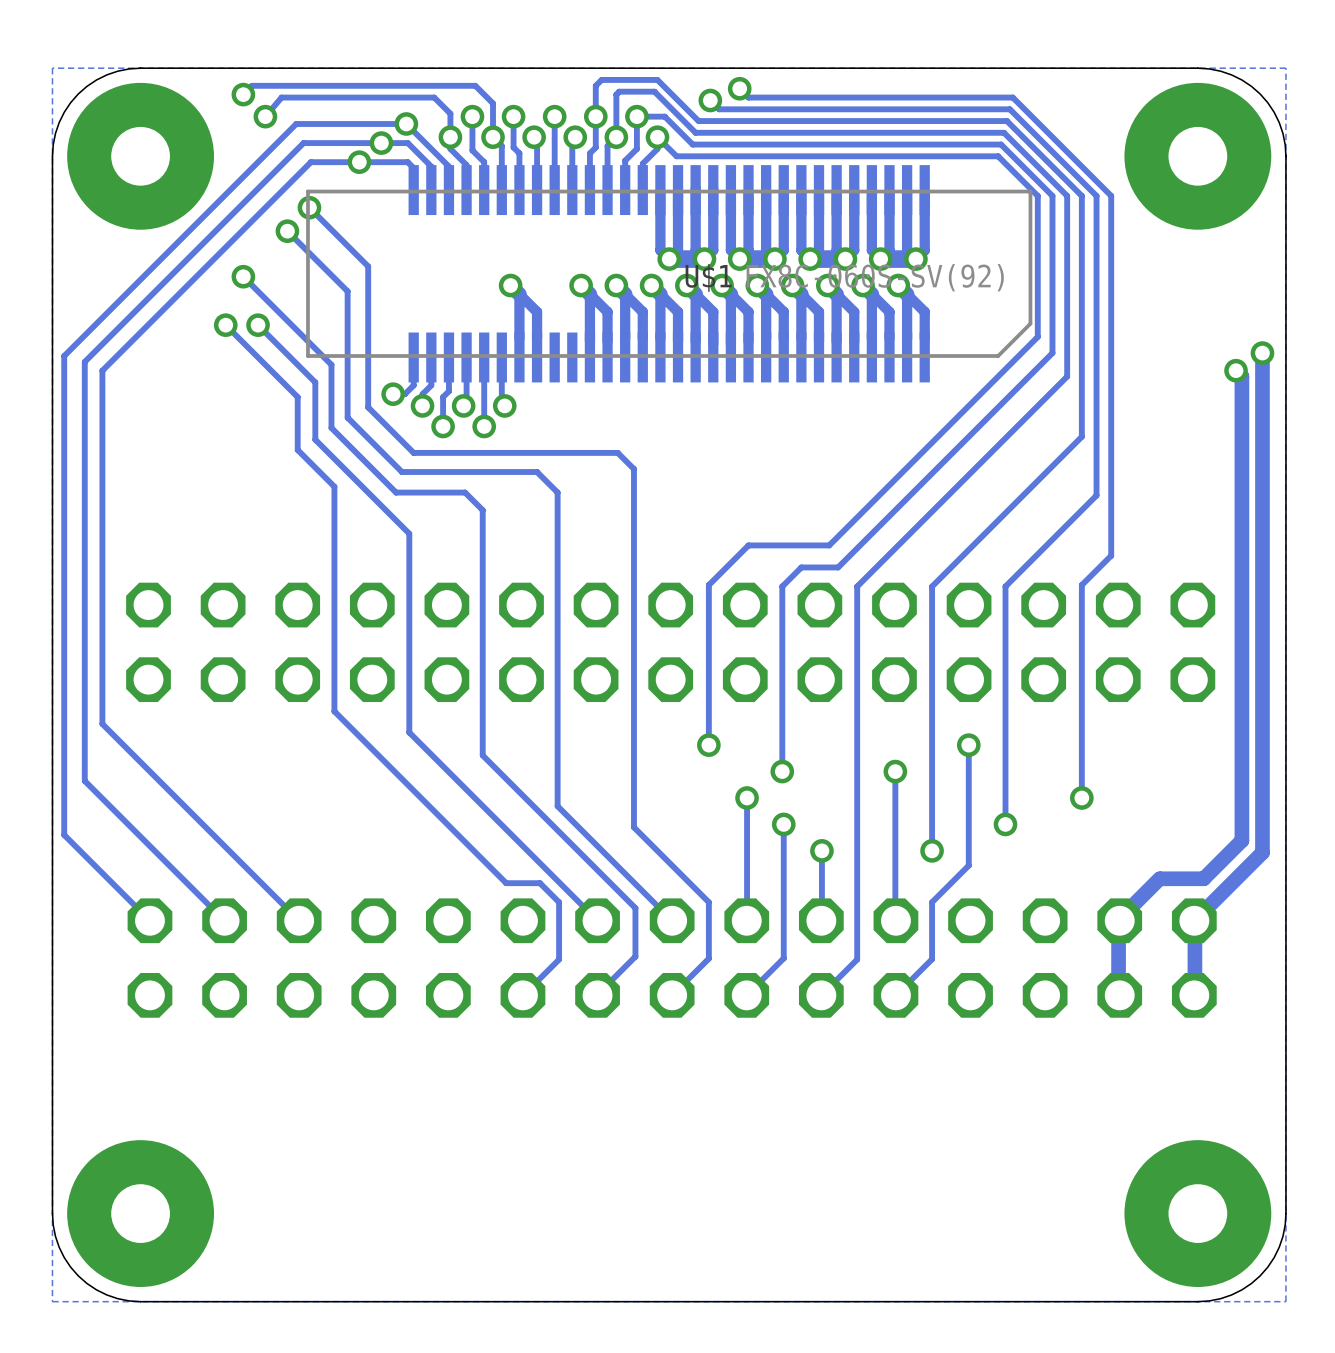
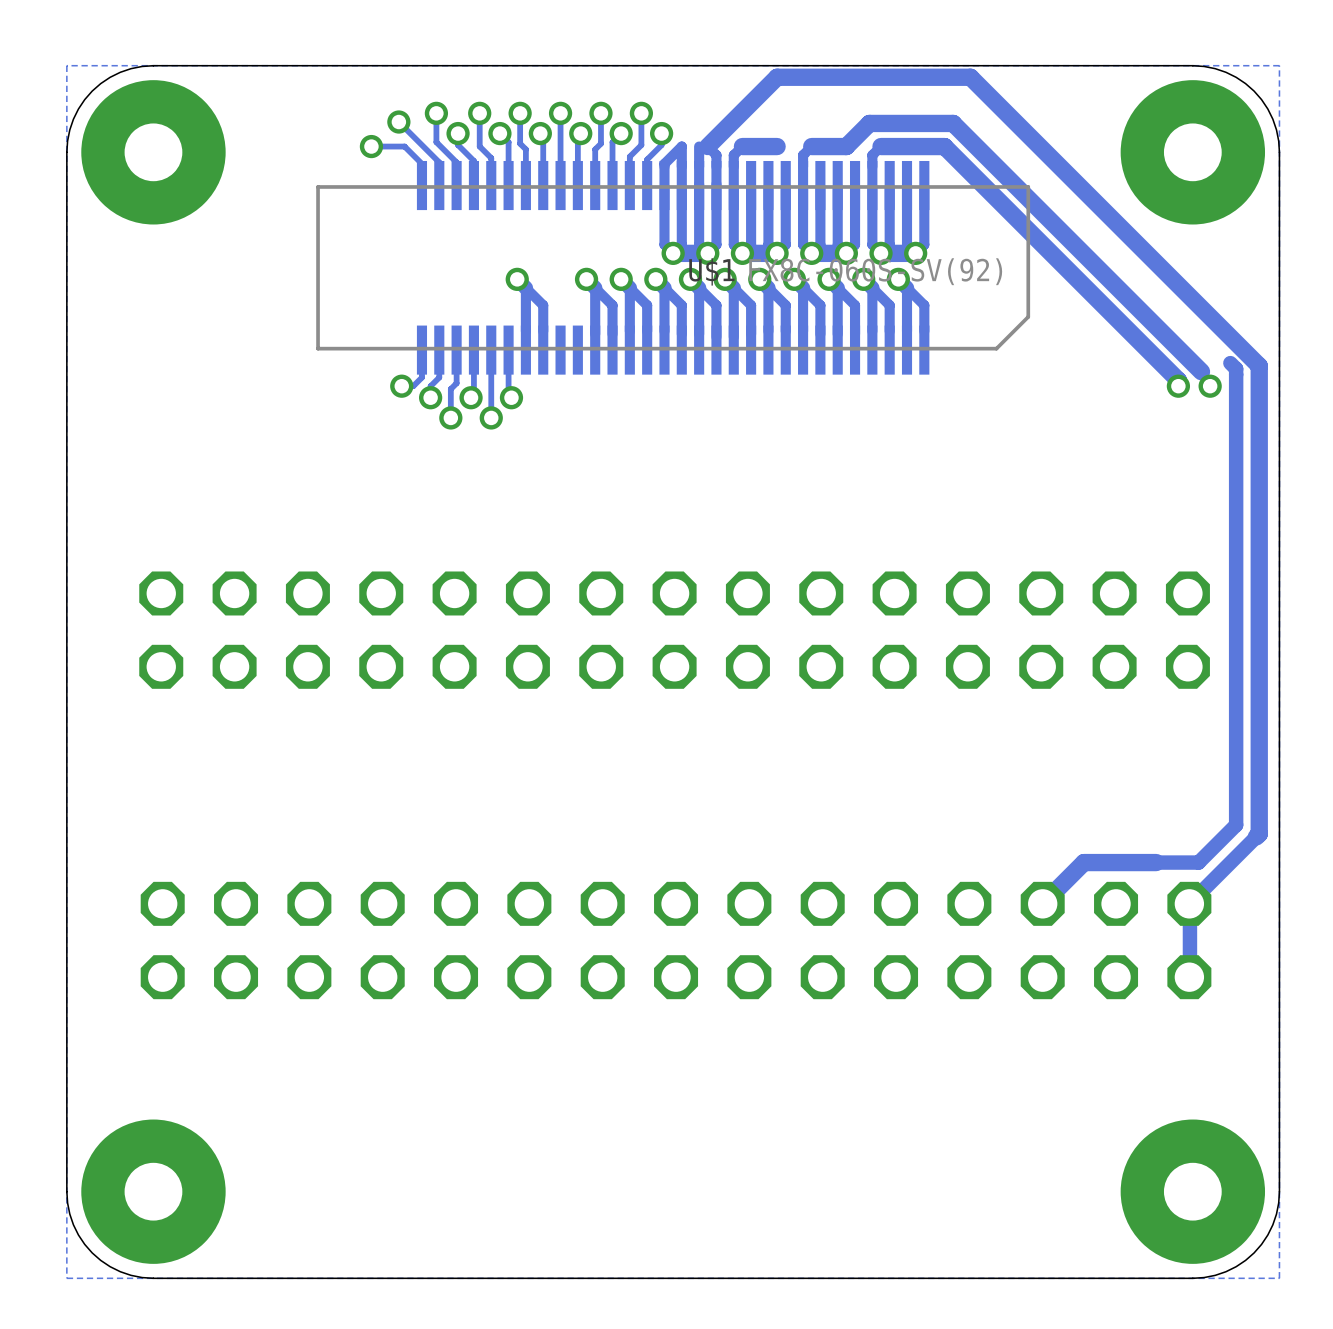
track: (739, 88) (748, 97) (1012, 97) (1111, 195) (1111, 555) (1081, 585) (1081, 798) -> none
via: (739, 88) -> none
track: (243, 94) (252, 85) (475, 85) (493, 103) (493, 137) -> none
via: (243, 94) -> none
track: (710, 100) (719, 109) (1009, 109) (1096, 195) (1096, 495) (1005, 586) (1005, 824) -> none
via: (710, 100) -> none
track: (265, 116) (281, 97) (434, 97) (450, 113) (450, 137) -> none
via: (265, 116) -> none
via: none -> (436, 113)
track: (595, 116) (595, 85) (601, 79) (657, 79) (698, 121) (1006, 121) (1081, 195) (1081, 436) (932, 586) (932, 850) -> none
track: (636, 116) (664, 116) (692, 144) (1001, 144) (1052, 195) (1052, 353) (838, 567) (801, 567) (782, 586) (782, 771) -> none
via: (406, 123) -> none
via: none -> (398, 122)
track: (616, 135) (616, 94) (619, 91) (654, 91) (695, 132) (1004, 132) (1067, 195) (1067, 376) (857, 586) (857, 959) (821, 995) -> none
track: (657, 137) (676, 156) (998, 156) (1037, 195) (1037, 336) (829, 545) (748, 545) (708, 585) (708, 745) -> none
via: (381, 143) -> none
track: (407, 143) (303, 143) (84, 361) (84, 780) (224, 920) -> (416, 139) (398, 122)
track: (428, 146) (406, 123) (296, 123) (64, 356) (64, 835) (149, 920) -> (436, 142) (436, 113)
via: none -> (371, 146)
track: none -> (699, 146) (699, 166)
track: none -> (777, 146) (742, 146) (733, 155) (733, 166)
via: (359, 162) -> none
track: (407, 162) (310, 162) (102, 370) (102, 723) (299, 920) -> (416, 158) (404, 146) (371, 146)
track: none -> (681, 166) (681, 146) (664, 163) (664, 166)
track: none -> (803, 166) (803, 155) (811, 146) (846, 146) (869, 123) (953, 123) (1201, 371)
track: none -> (872, 166) (872, 155) (881, 146) (944, 146) (1178, 380) (1178, 386)
track: (309, 207) (368, 266) (368, 407) (413, 452) (617, 452) (633, 469) (633, 827) (708, 902) (708, 958) (672, 995) -> none
via: (309, 207) -> none
track: (287, 231) (347, 291) (347, 417) (401, 472) (537, 472) (557, 492) (557, 806) (672, 920) -> none
via: (287, 231) -> none
track: (243, 276) (331, 364) (331, 427) (396, 492) (465, 492) (482, 510) (482, 755) (635, 908) (635, 956) (595, 996) -> none
via: (243, 276) -> none
track: (225, 325) (297, 397) (297, 449) (334, 486) (334, 711) (506, 883) (540, 883) (559, 902) (559, 959) (523, 995) -> none
via: (225, 325) -> none
track: (258, 325) (315, 382) (315, 439) (409, 533) (409, 732) (597, 920) -> none
via: (258, 325) -> none
track: (1262, 353) (1262, 852) -> (716, 166) (716, 155) (707, 146) (777, 77) (970, 77) (1259, 365) (1259, 833) (1256, 836)
via: (1262, 353) -> none
via: (1236, 370) -> none
via: none -> (1178, 386)
via: none -> (1210, 386)
via: (708, 745) -> none
track: (968, 745) (968, 865) (932, 902) (932, 959) (895, 995) -> none
via: (968, 745) -> none
via: (782, 771) -> none
track: (895, 771) (895, 920) -> none
via: (895, 771) -> none
track: (747, 798) (747, 920) -> none
via: (747, 798) -> none
via: (1081, 798) -> none
track: (783, 824) (783, 958) (746, 995) -> none
via: (783, 824) -> none
via: (1005, 824) -> none
track: (821, 850) (821, 920) -> none
via: (821, 850) -> none
via: (932, 850) -> none
track: (1159, 878) (1118, 919) (1118, 996) -> (1156, 862) (1083, 862) (1042, 903)

